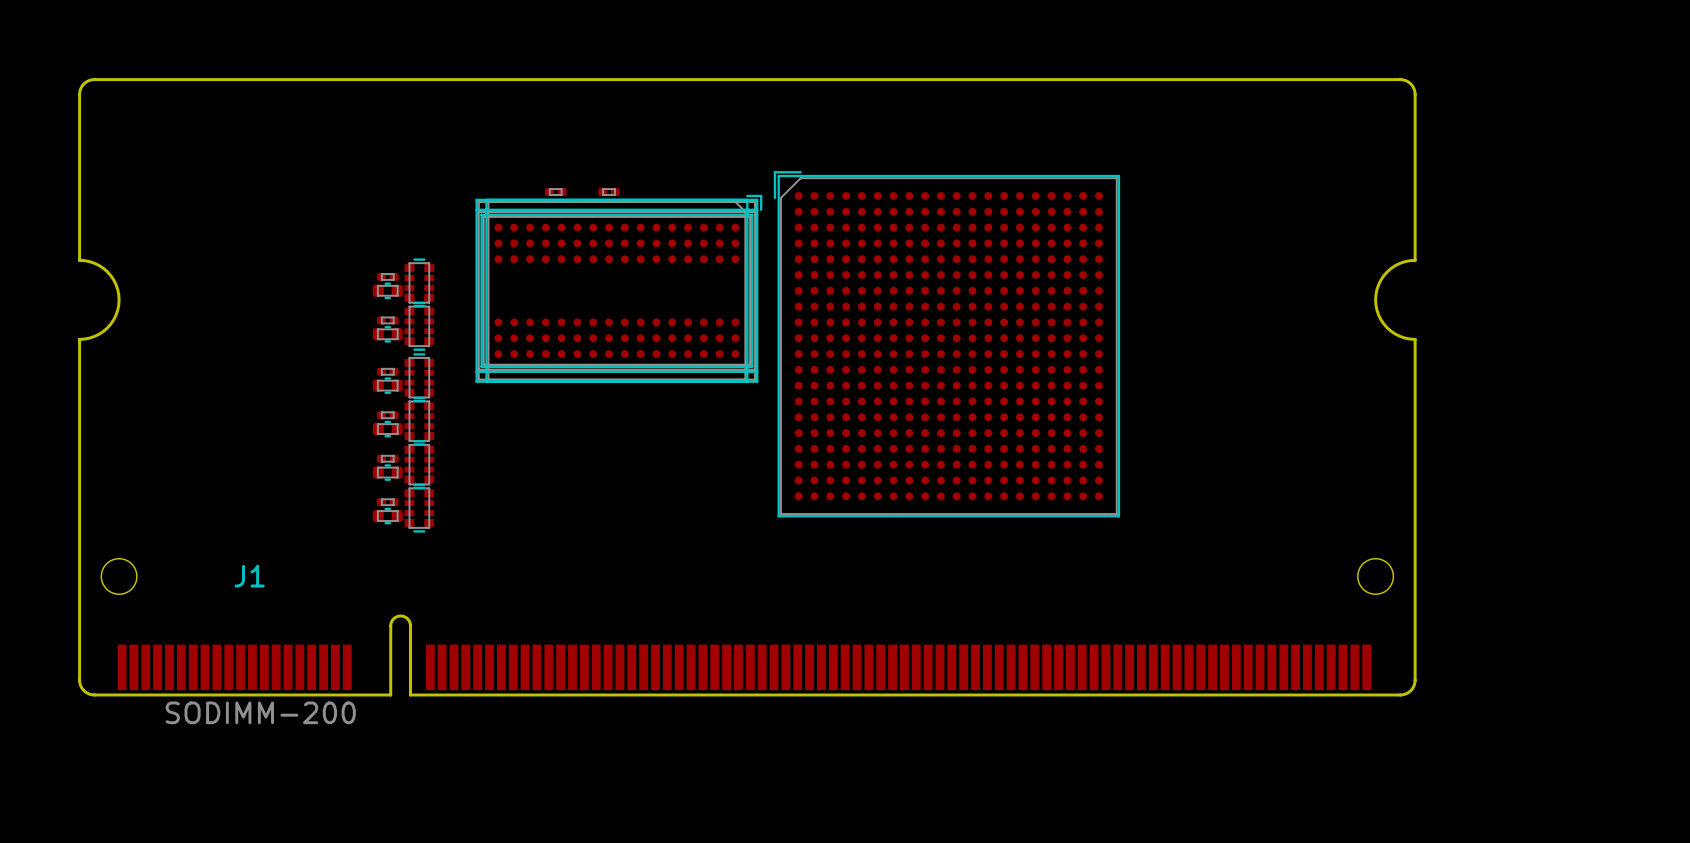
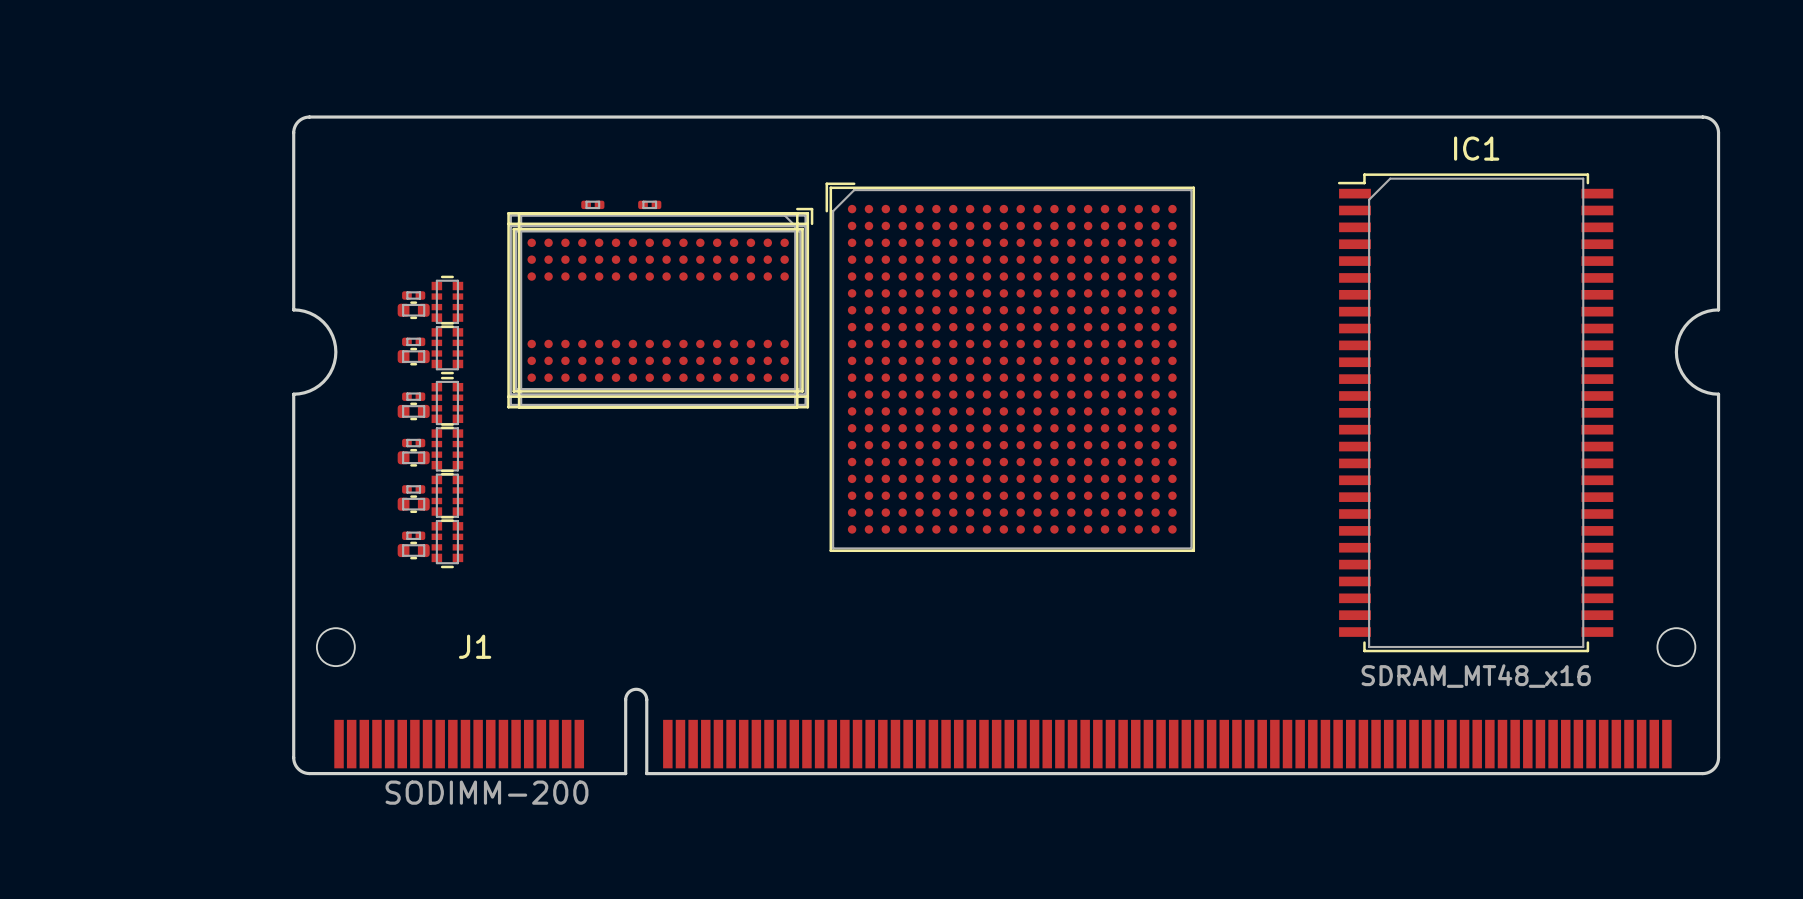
board edge: (94, 79) (1405, 80) (1412, 85) (1415, 94) (1415, 260) (1399, 263) (1387, 271) (1378, 284) (1375, 299) (1378, 314) (1387, 327) (1399, 336) (1415, 339) (1413, 685) (1407, 693) (1400, 695) (410, 695) (410, 624) (406, 618) (400, 615) (394, 618) (390, 624) (390, 695) (88, 693) (82, 689) (79, 680) (79, 339) (94, 336) (107, 327) (116, 314) (119, 299) (116, 284) (107, 271) (94, 263) (79, 260) (79, 92) (85, 82) (94, 79) -> (309, 117) (1708, 118) (1715, 123) (1718, 132) (1718, 309) (1702, 313) (1688, 322) (1679, 335) (1676, 352) (1679, 368) (1688, 381) (1702, 390) (1718, 394) (1717, 763) (1710, 771) (1702, 773) (646, 773) (646, 698) (643, 692) (636, 689) (629, 691) (625, 698) (625, 773) (303, 772) (296, 767) (293, 757) (293, 394) (309, 390) (323, 381) (332, 368) (335, 352) (332, 335) (323, 322) (309, 313) (293, 309) (293, 130) (299, 120) (309, 117)
IC1: none -> SDRAM_MT48_x16 (1475, 412)
J1 position: (747, 624) -> (1006, 698)

